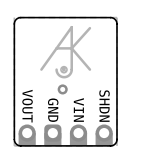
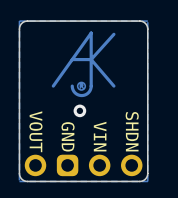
part footprint: [18, 124, 113, 146] -> [24, 154, 143, 177]

